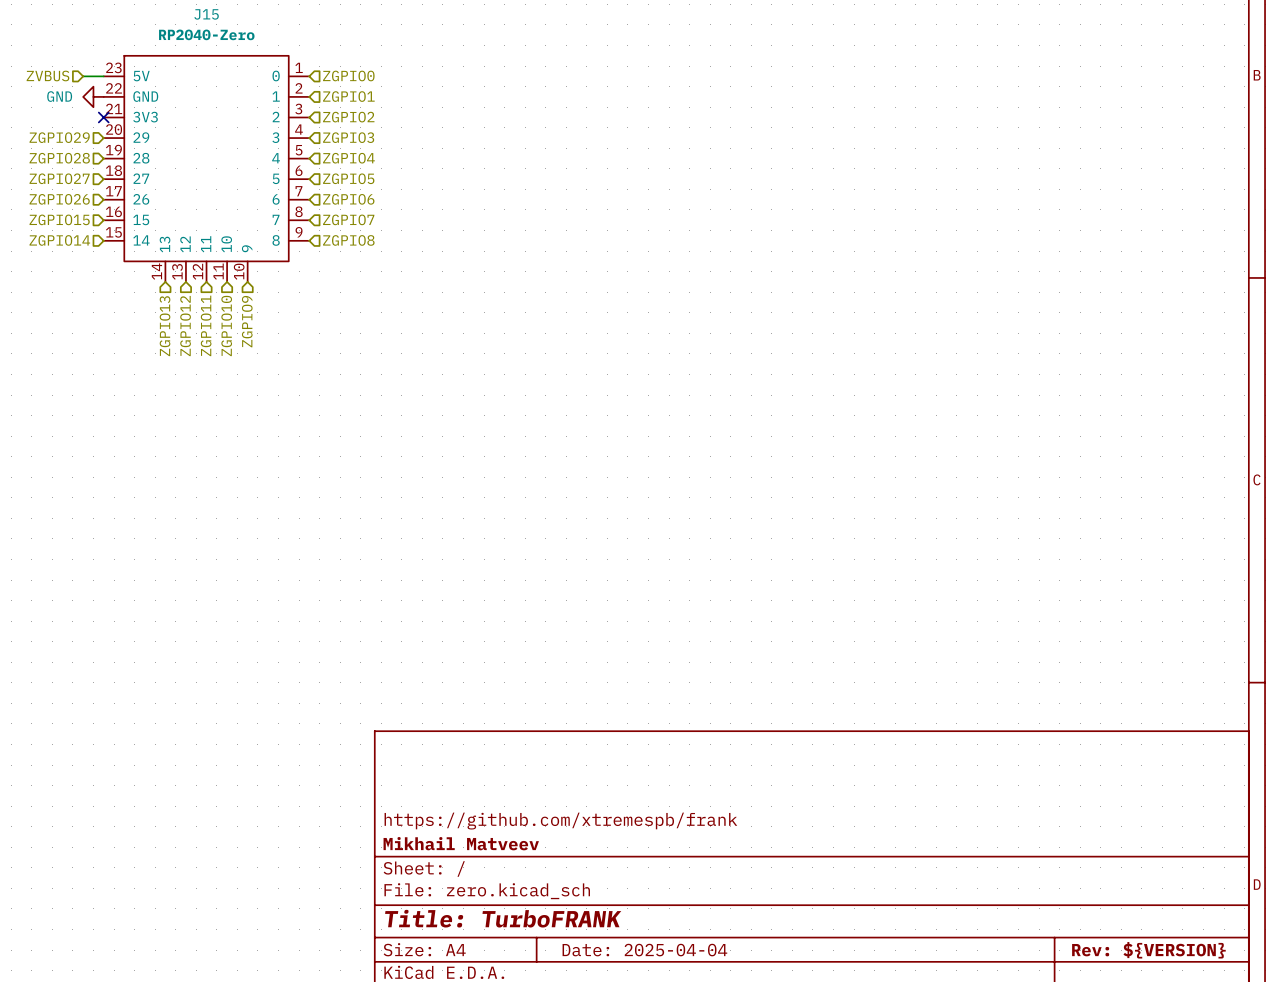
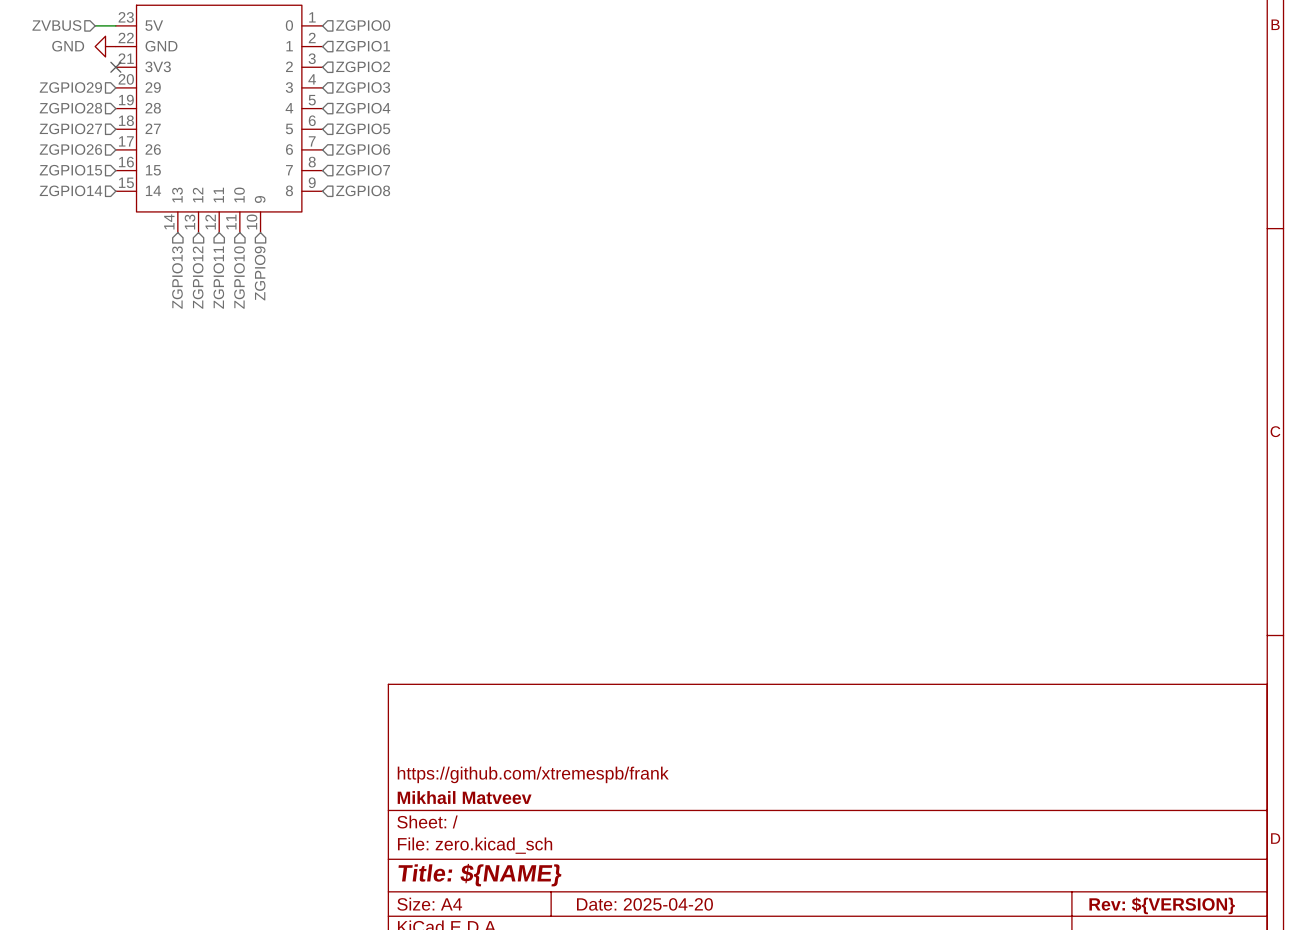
title block: Title: TurboFRANK (503, 918) -> Title: ${NAME} (479, 875)
title block: Date: 2025-04-04 (644, 950) -> Date: 2025-04-20 (644, 904)

